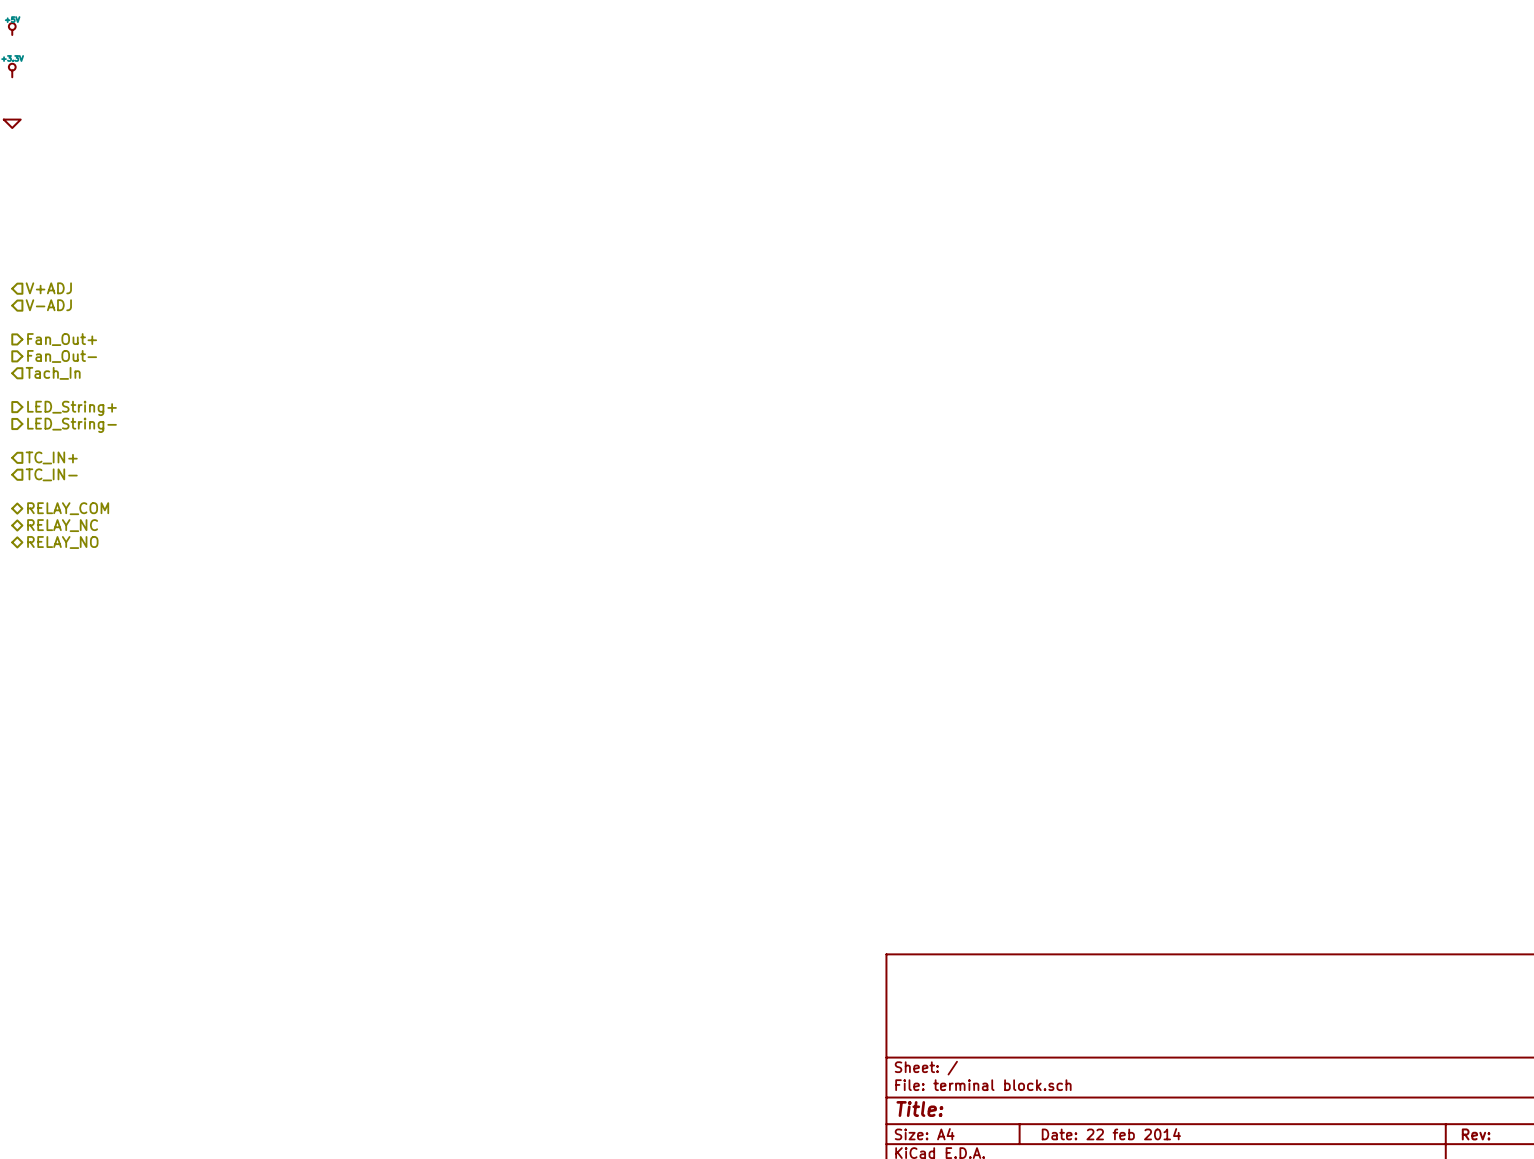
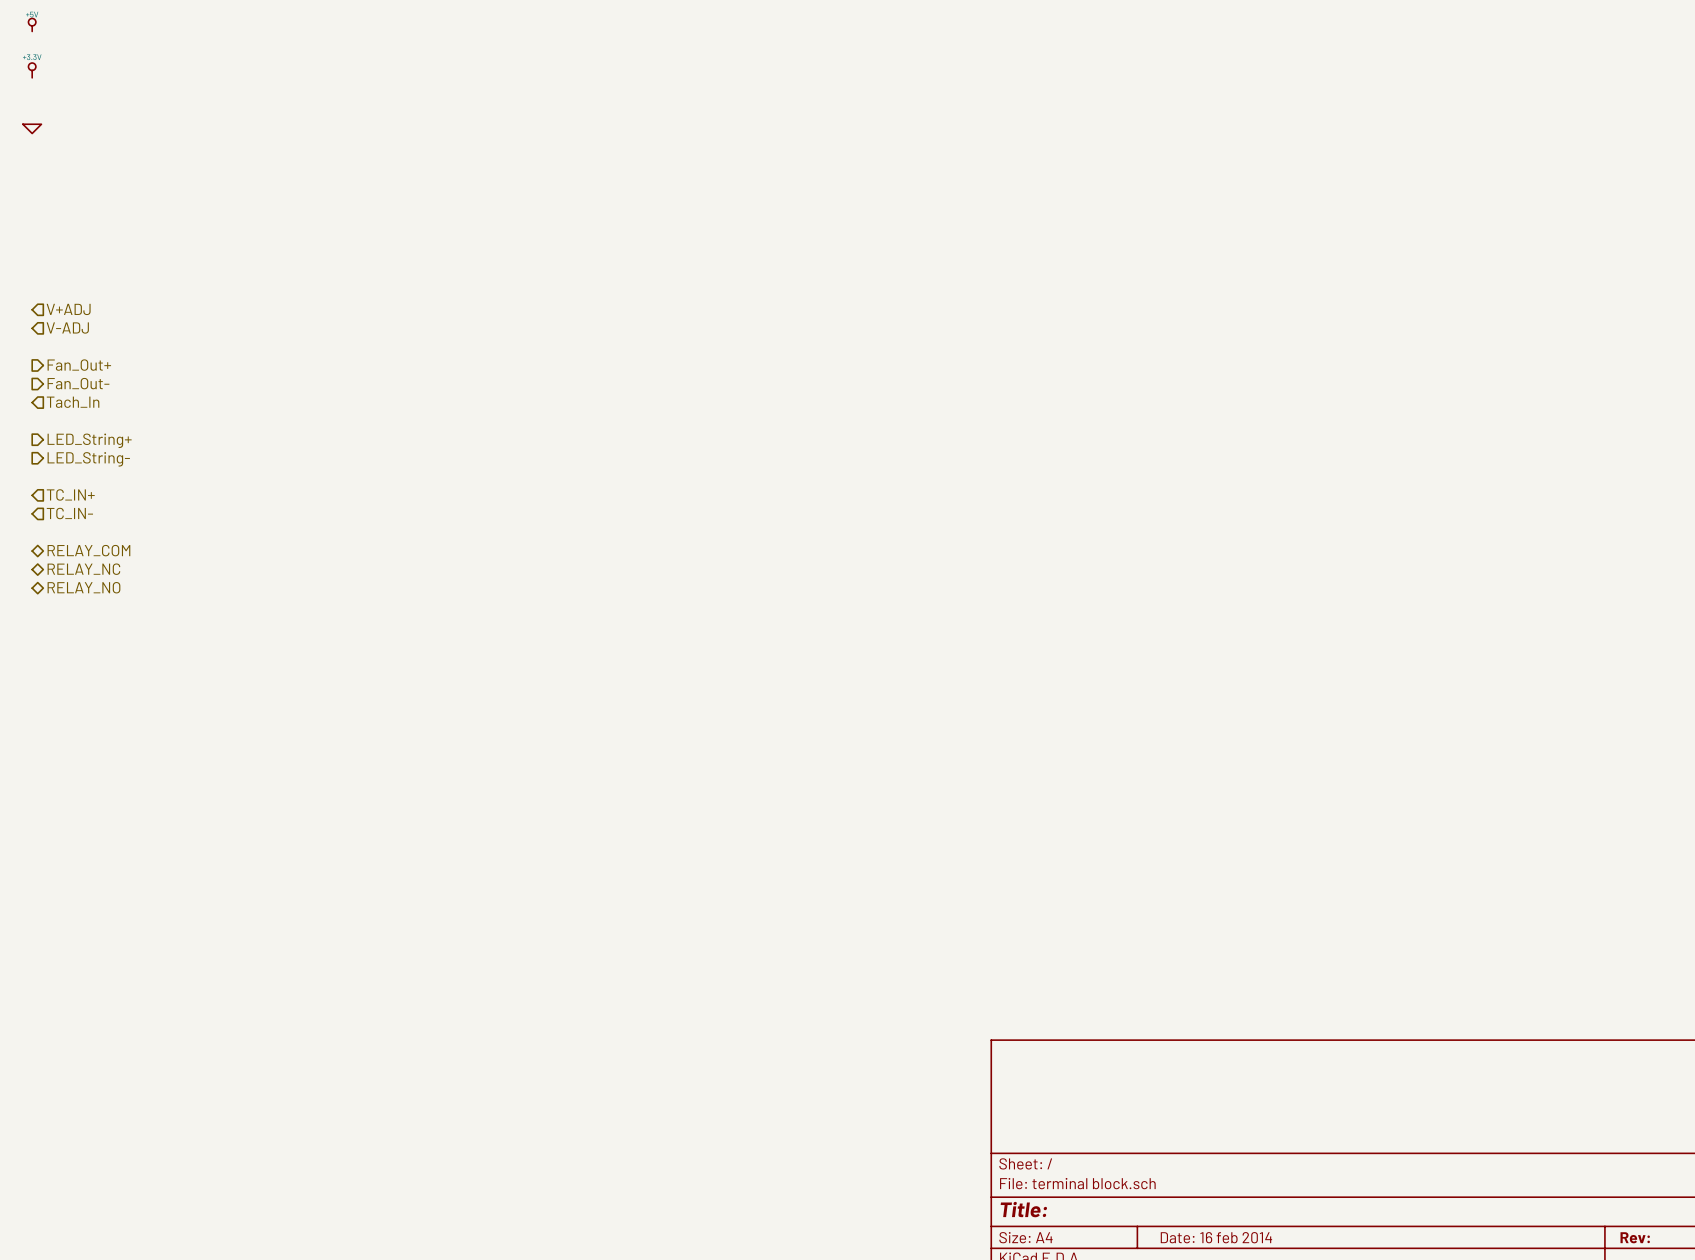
title block: Date: 22 feb 2014 (1111, 1134) -> Date: 16 feb 2014 (1216, 1237)

